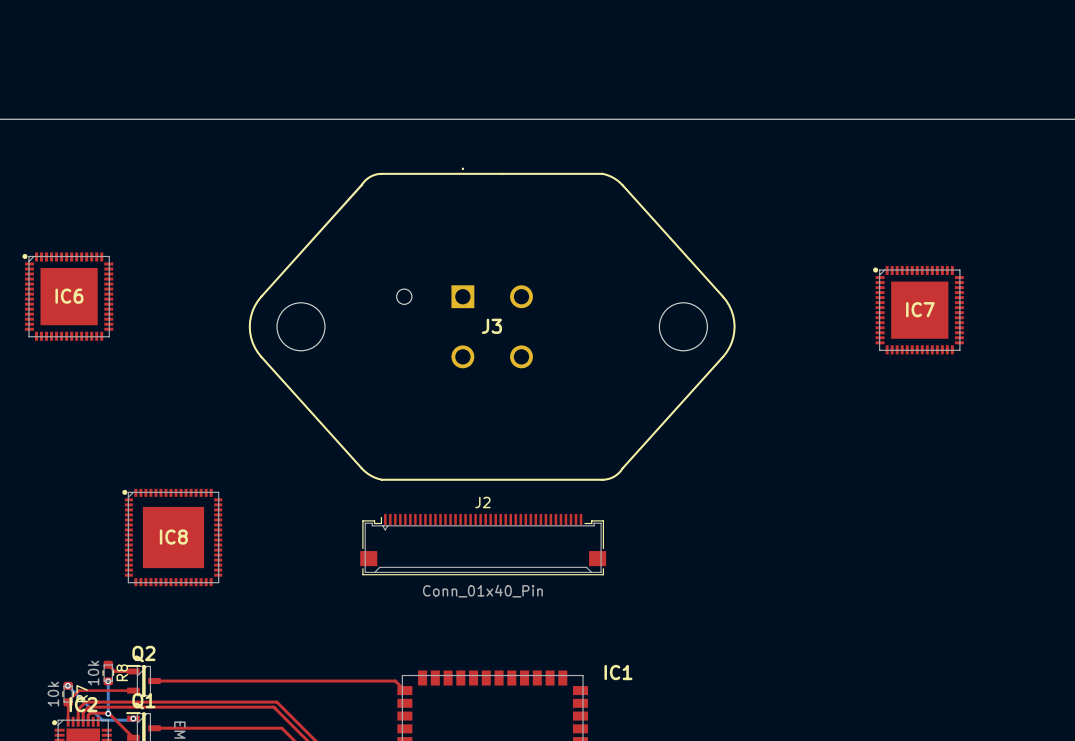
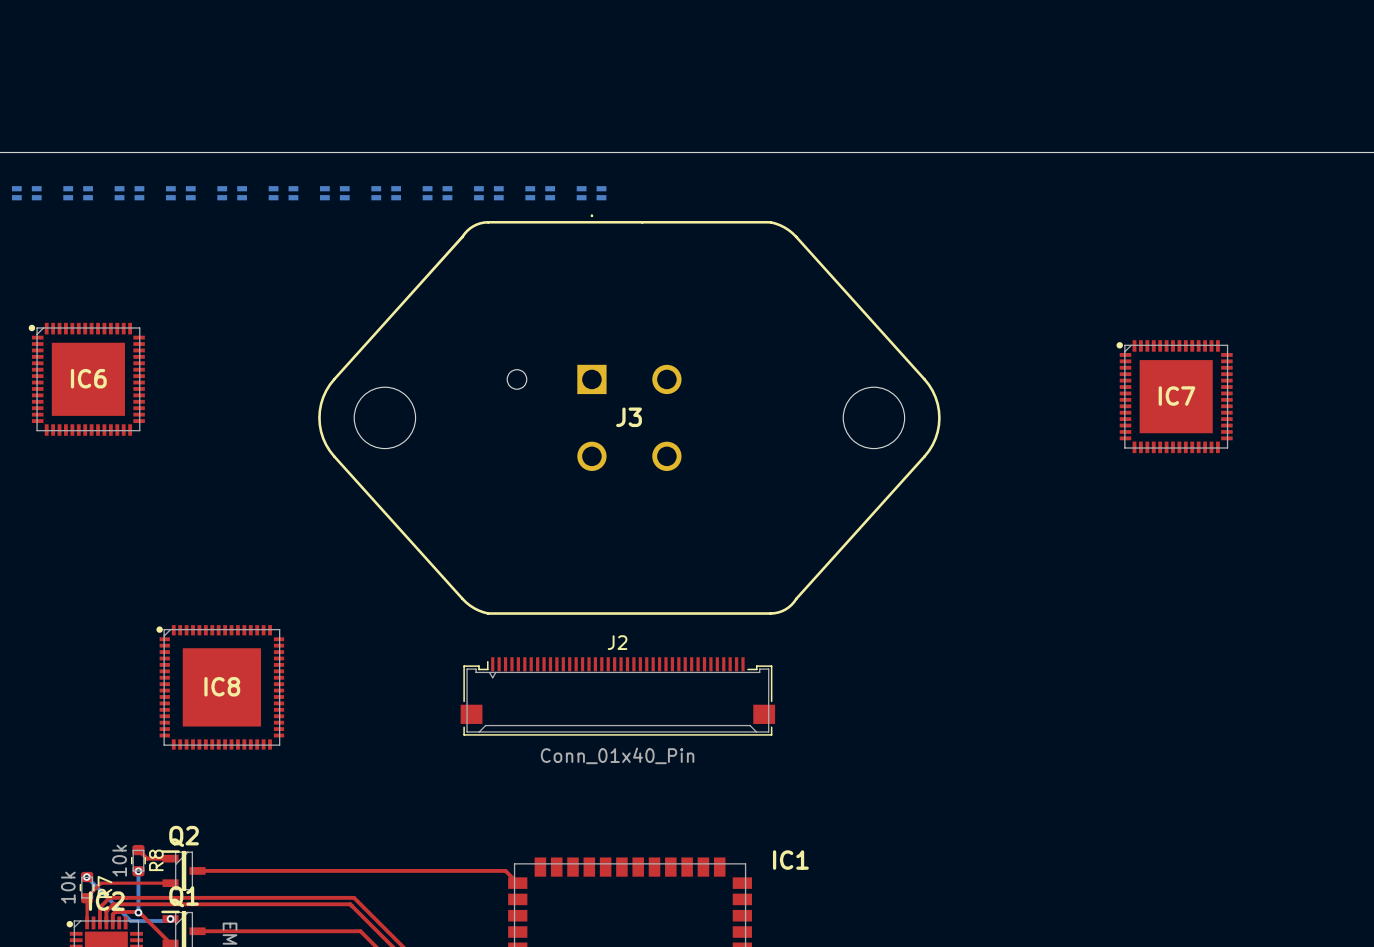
part: none -> (26, 193)
part: none -> (78, 193)
part: none -> (129, 193)
part: none -> (180, 193)
part: none -> (232, 193)
part: none -> (283, 193)
part: none -> (334, 193)
part: none -> (386, 193)
part: none -> (437, 193)
part: none -> (488, 193)
part: none -> (540, 193)
part: none -> (591, 193)

